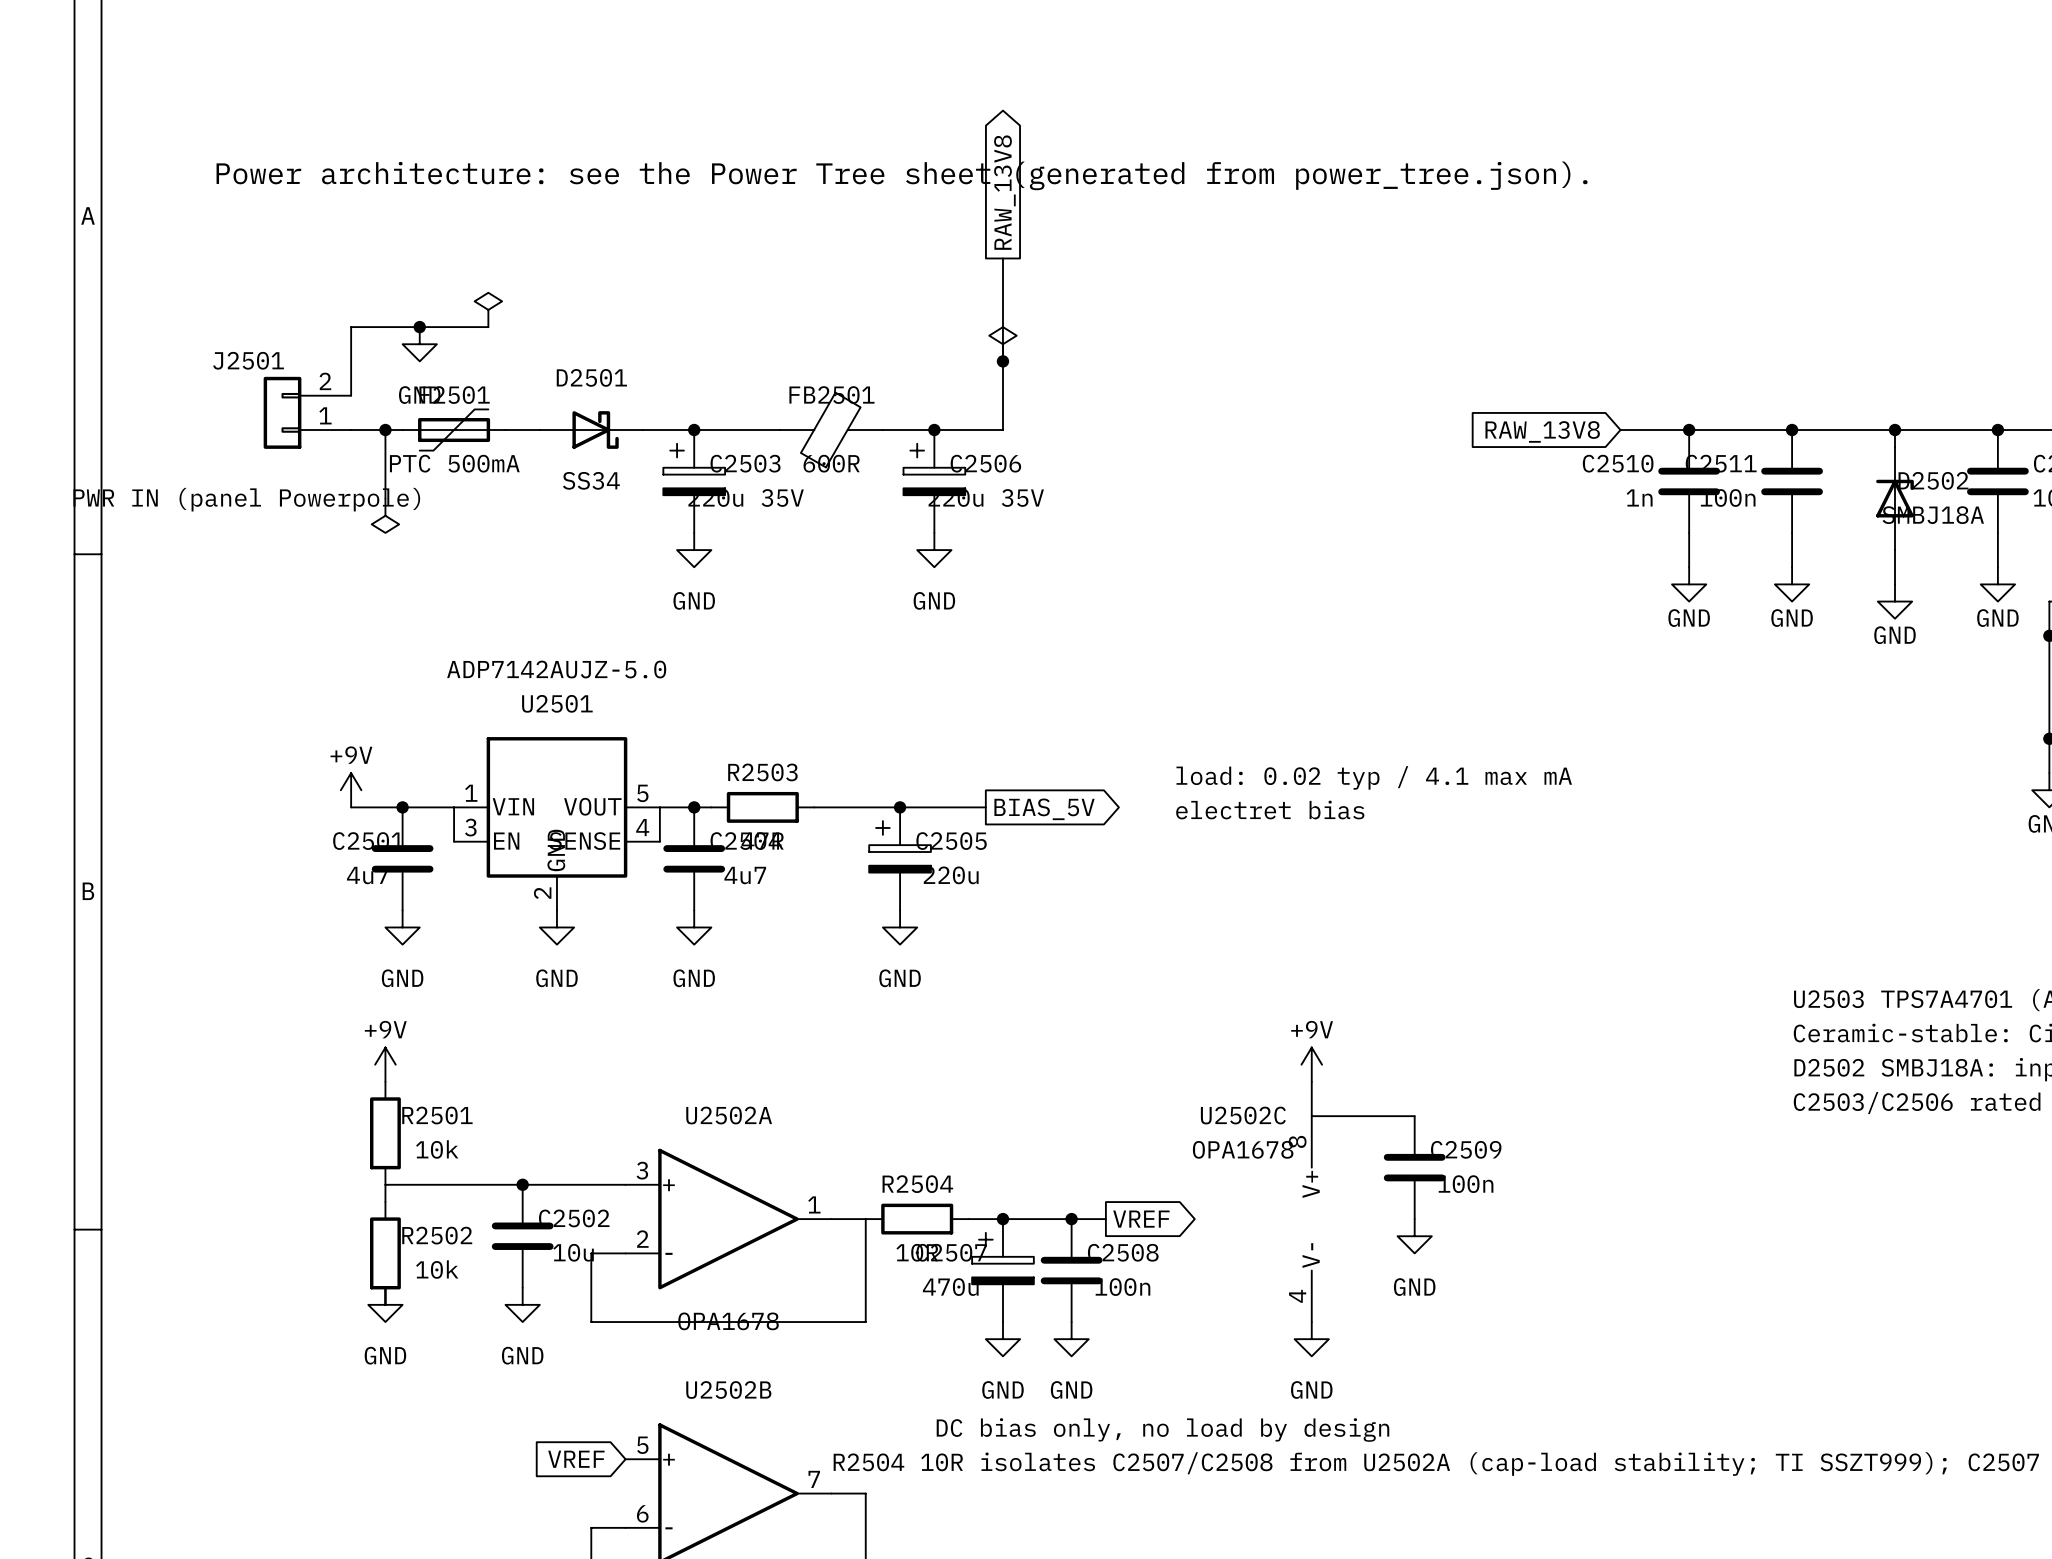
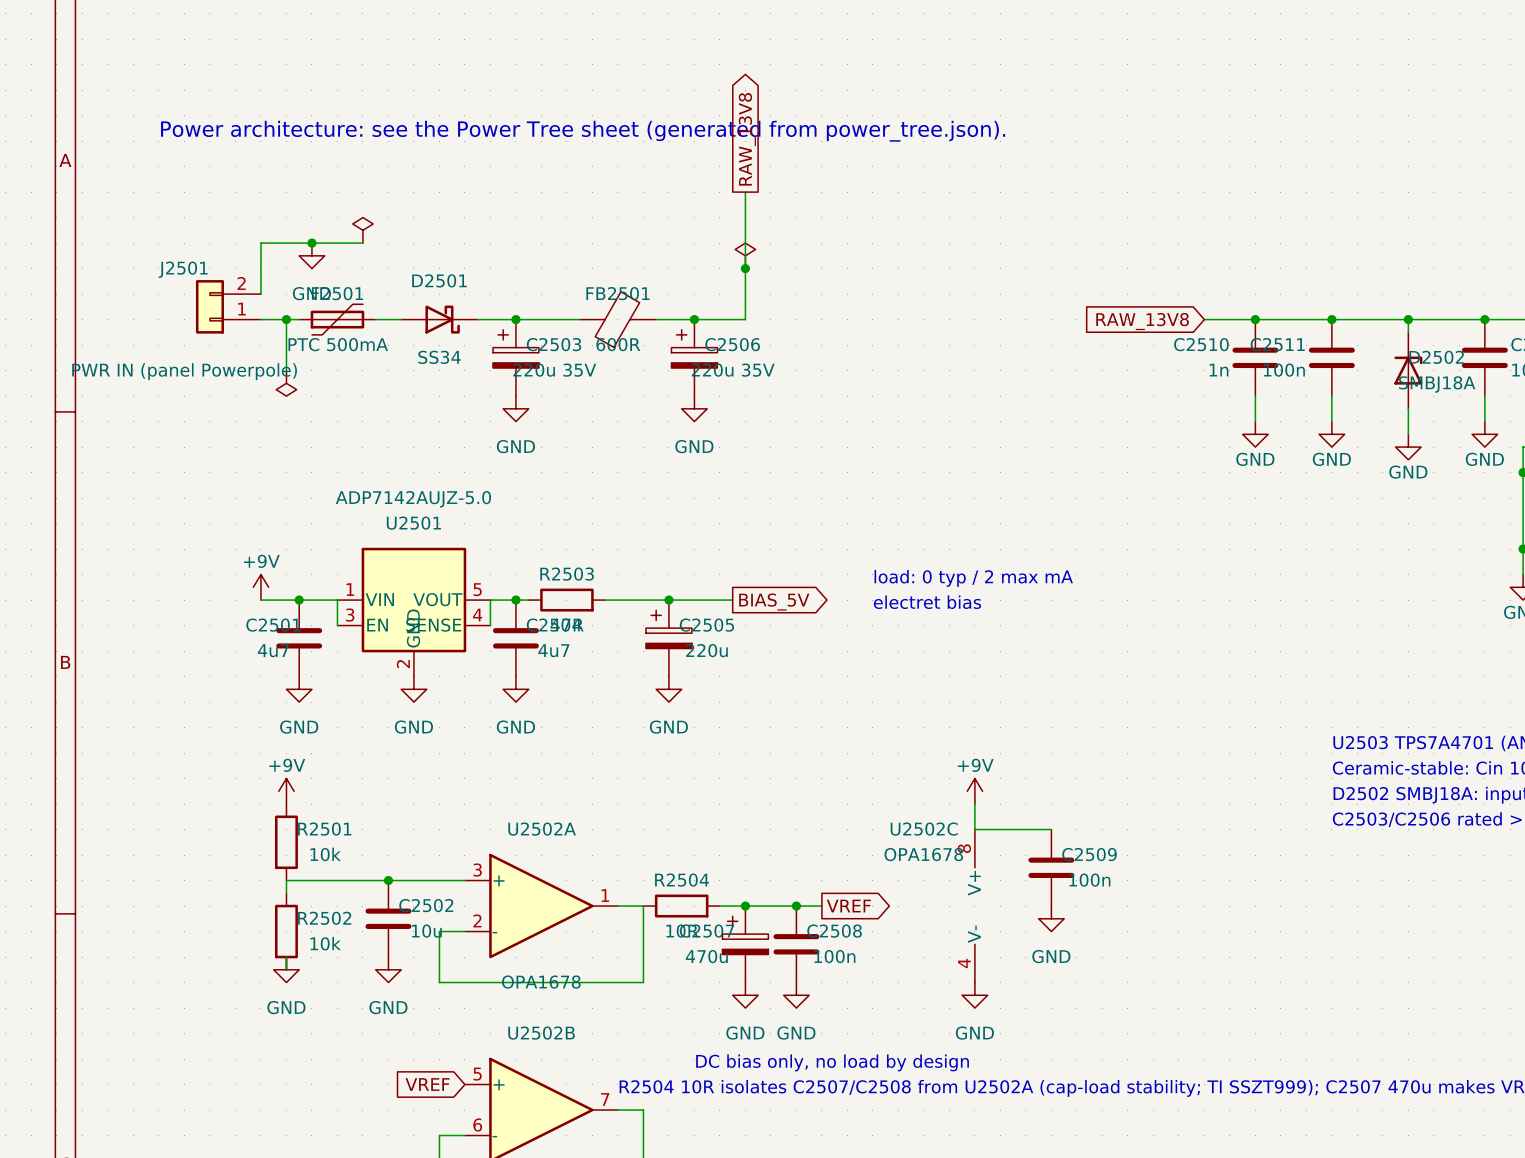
text: load: 0.02 typ / 4.1 max mA (1374, 777) -> load: 0 typ / 2 max mA (973, 578)

